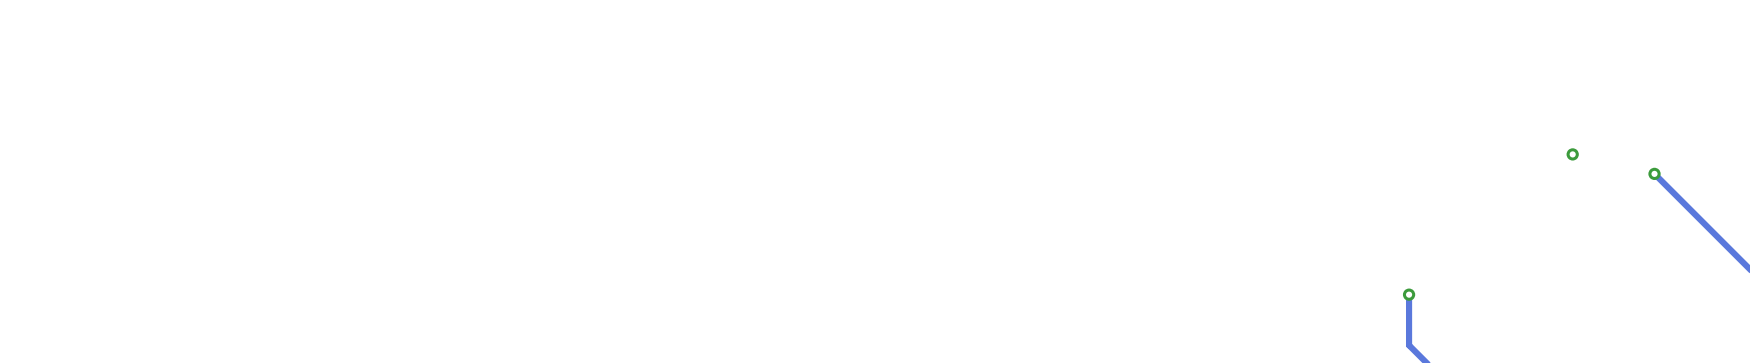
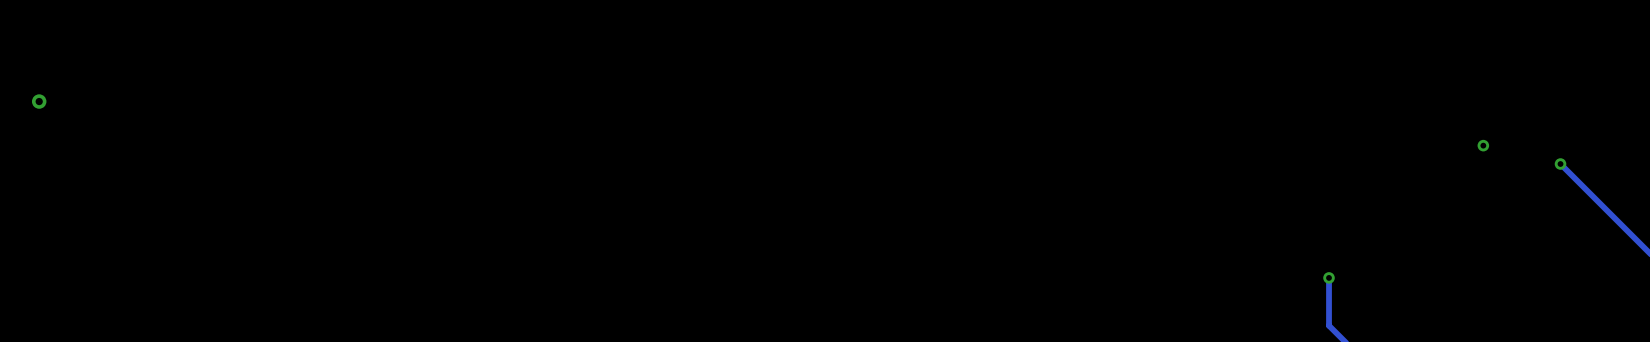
via: none -> (39, 101)

